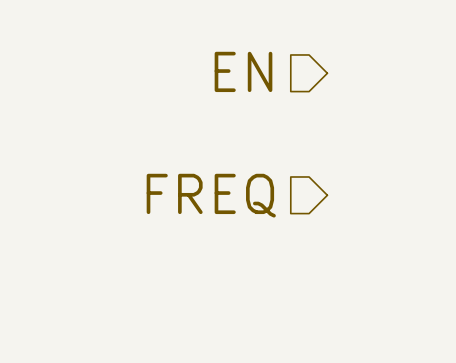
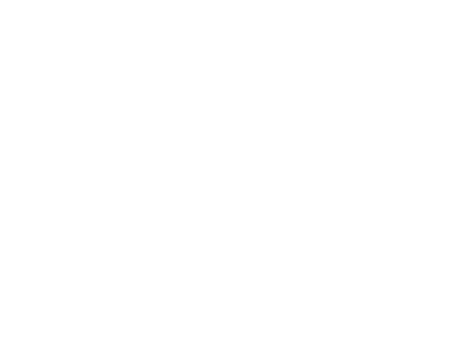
hierarchical label: EN (243, 71) -> none
hierarchical label: FREQ (211, 195) -> none

